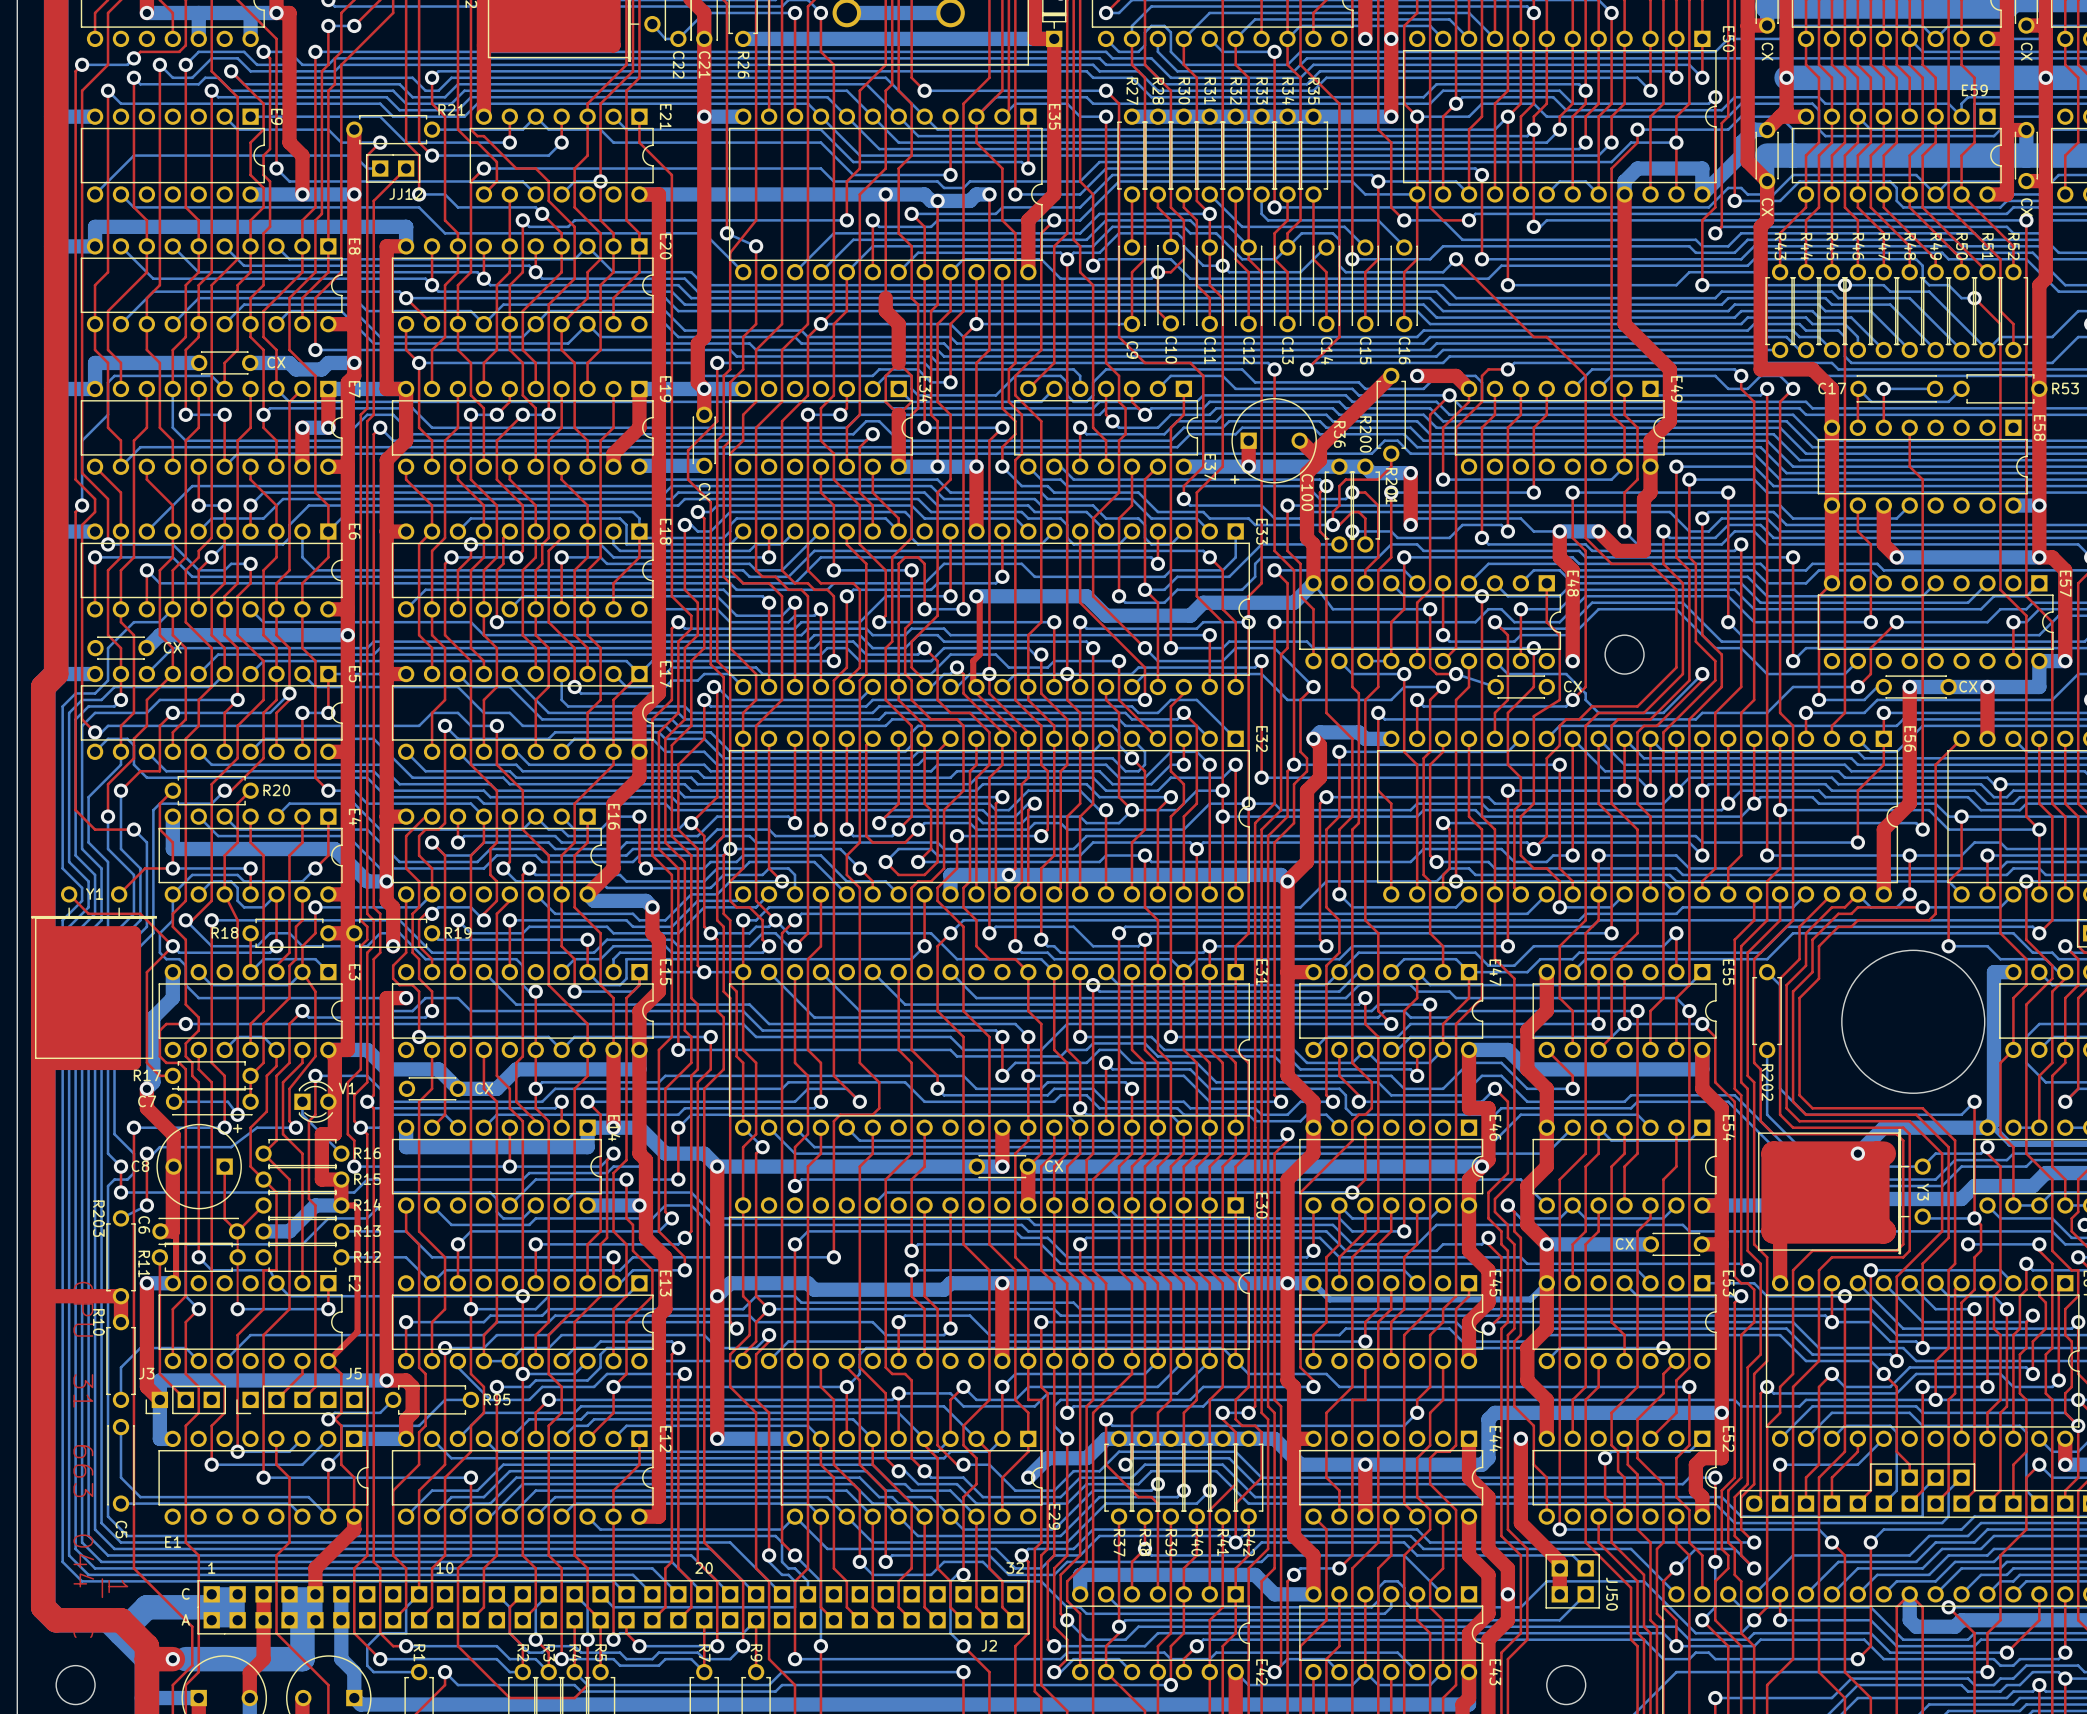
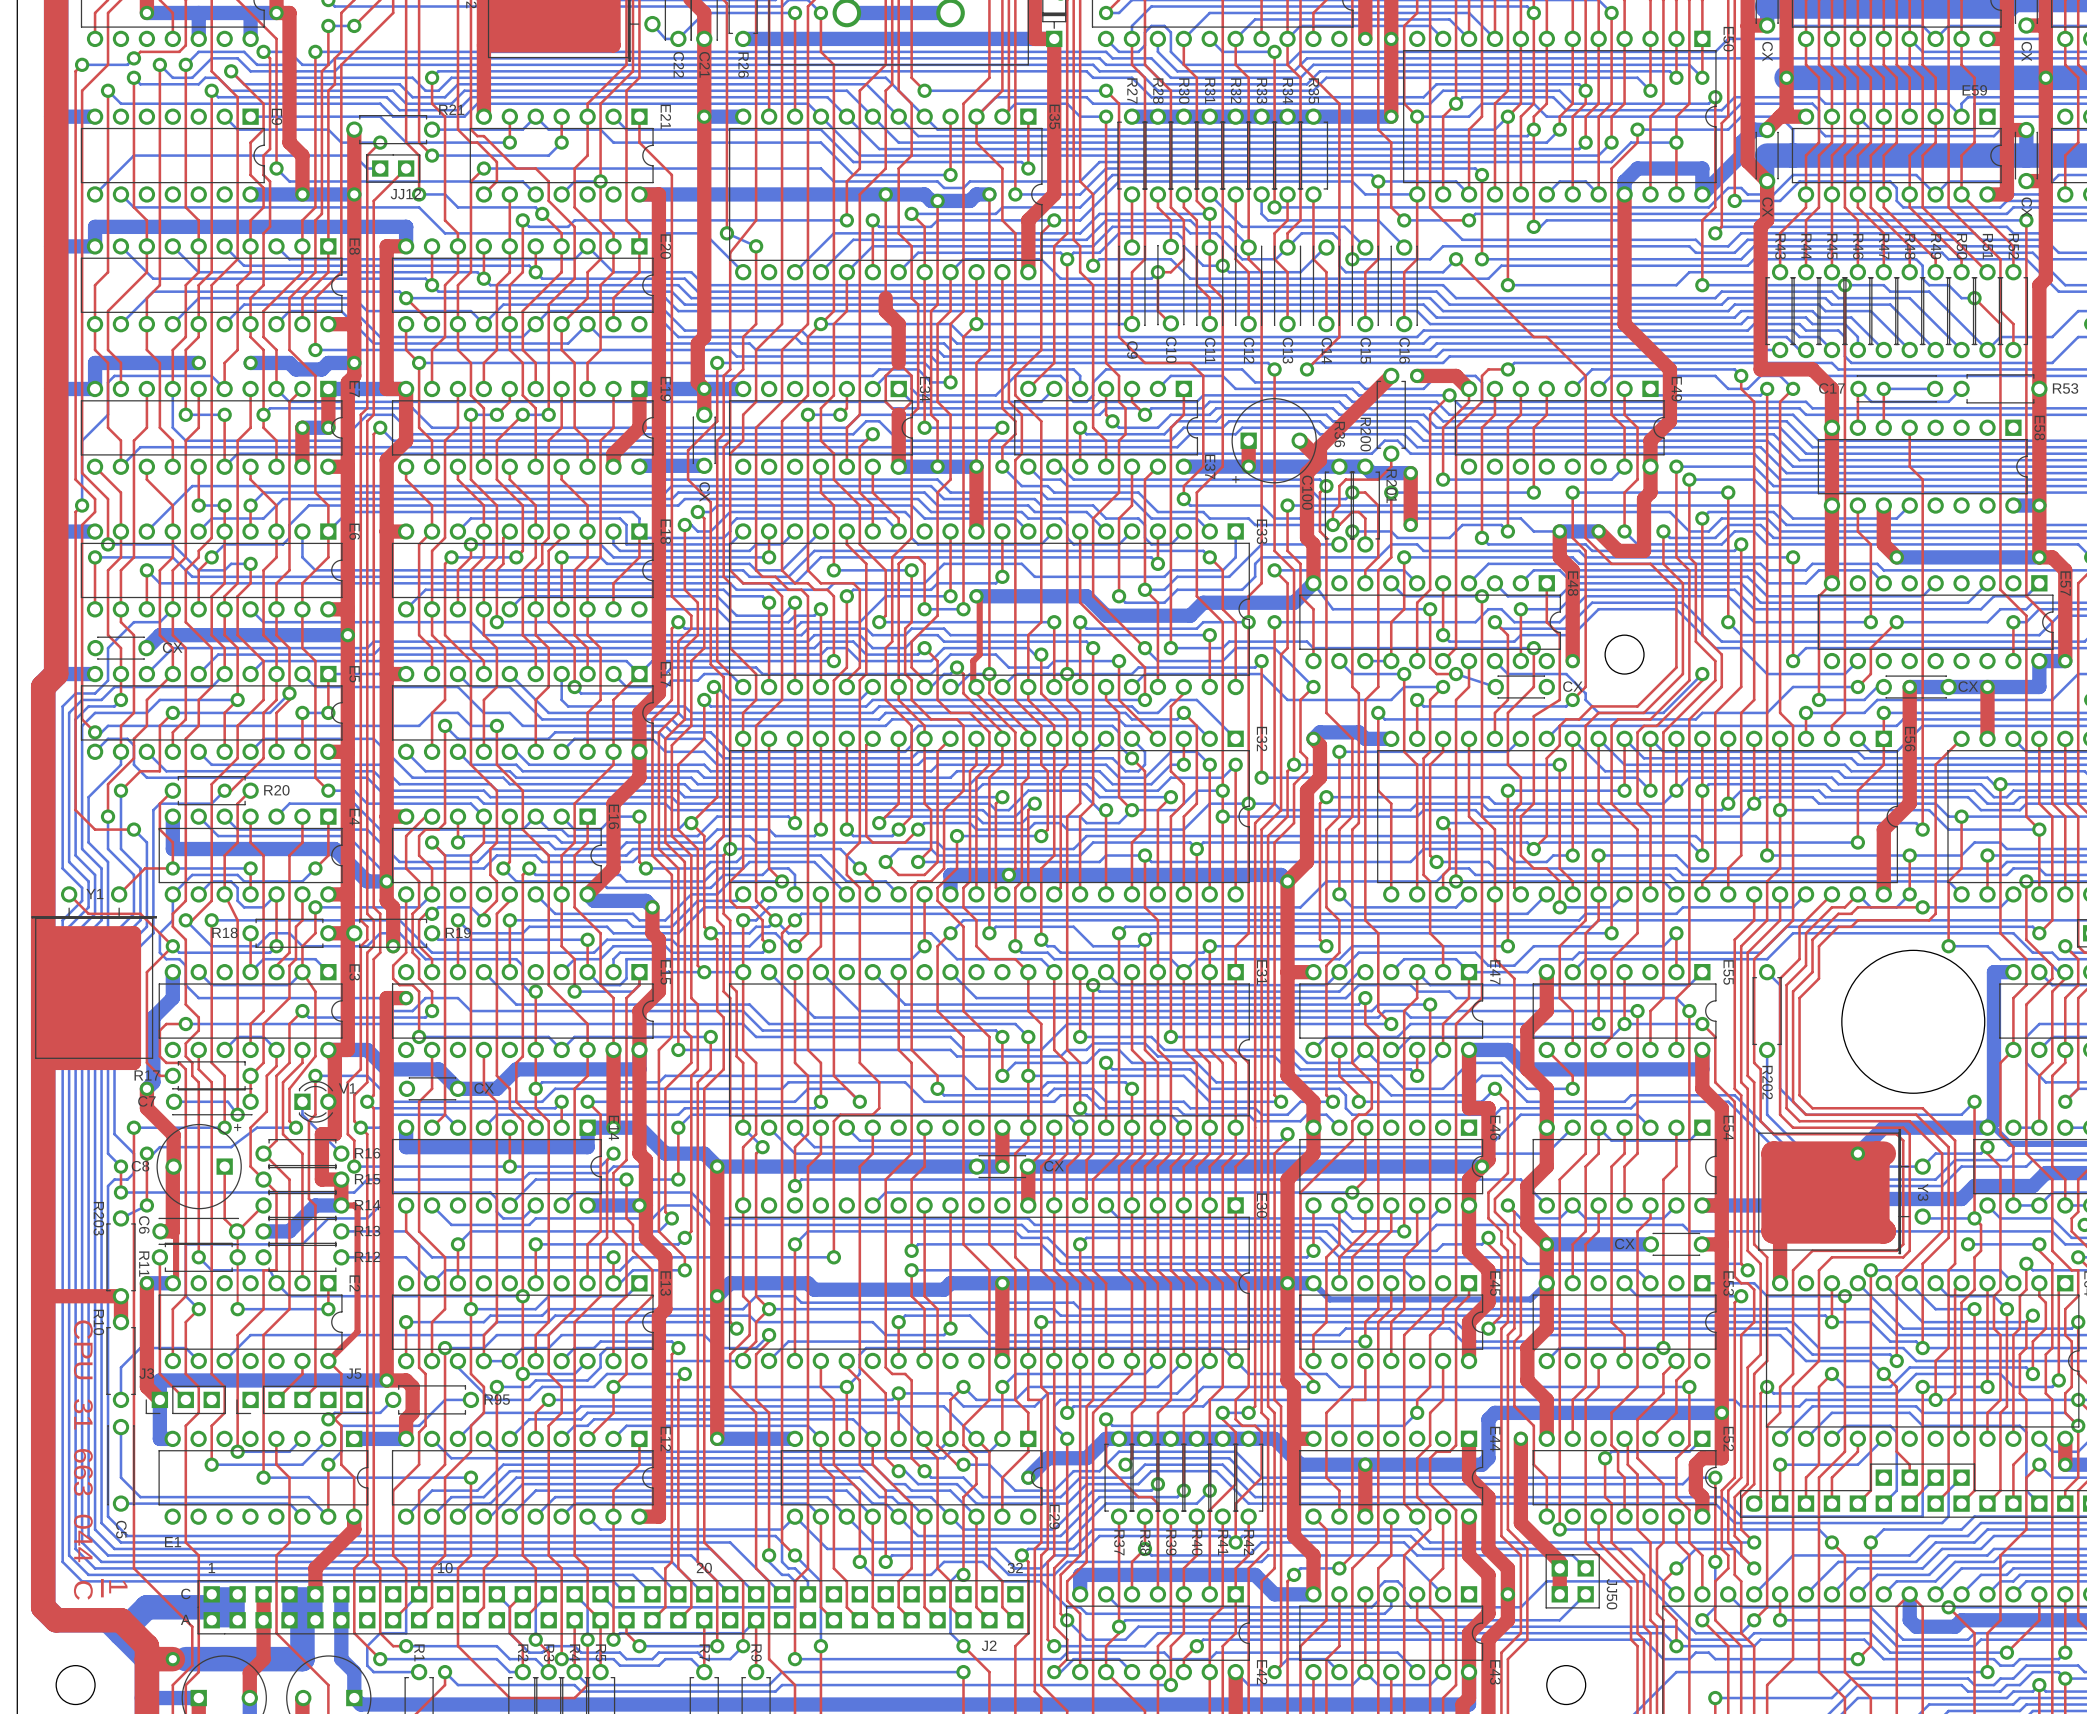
via: none -> (198, 362)
CX: (224, 362) -> none
via: none -> (250, 362)

